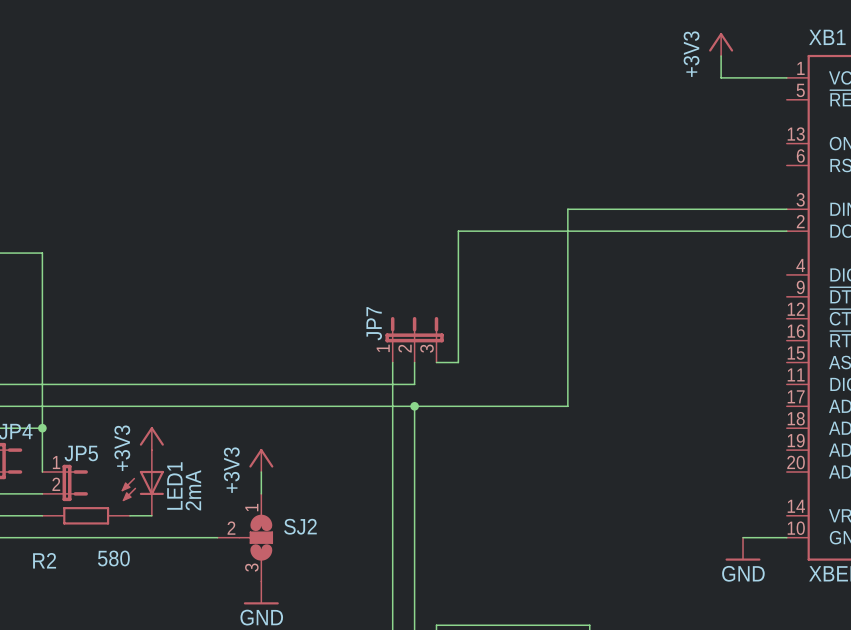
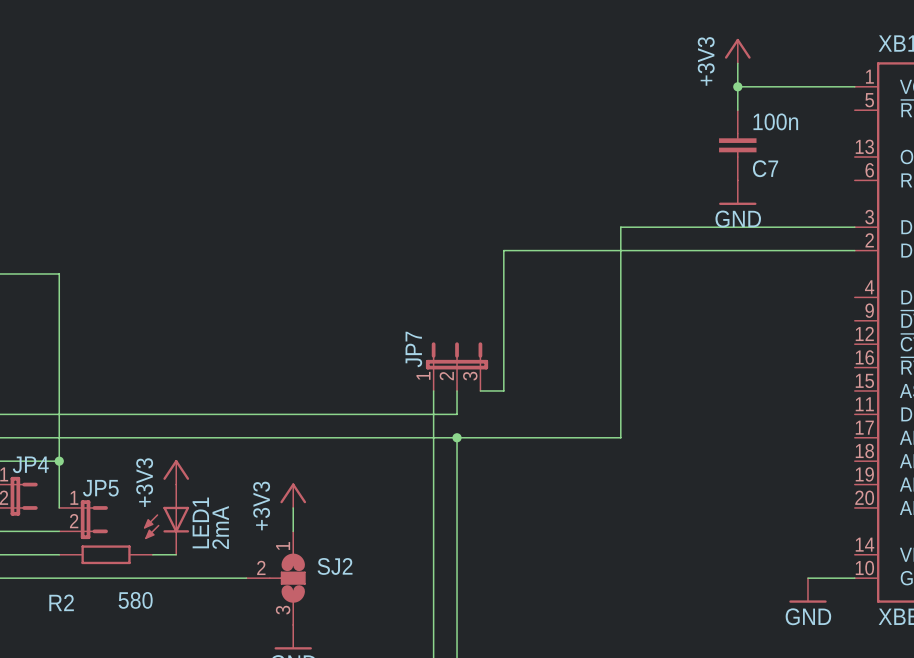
power symbol position: +3V3 (721, 44) -> +3V3 (737, 51)
wire: none -> (737, 63) (737, 110)
wire: (721, 56) (721, 77) -> (737, 86) (784, 86)
junction: none -> (737, 86)
C7: none -> 100n (737, 145)
power symbol: none -> GND (737, 192)

